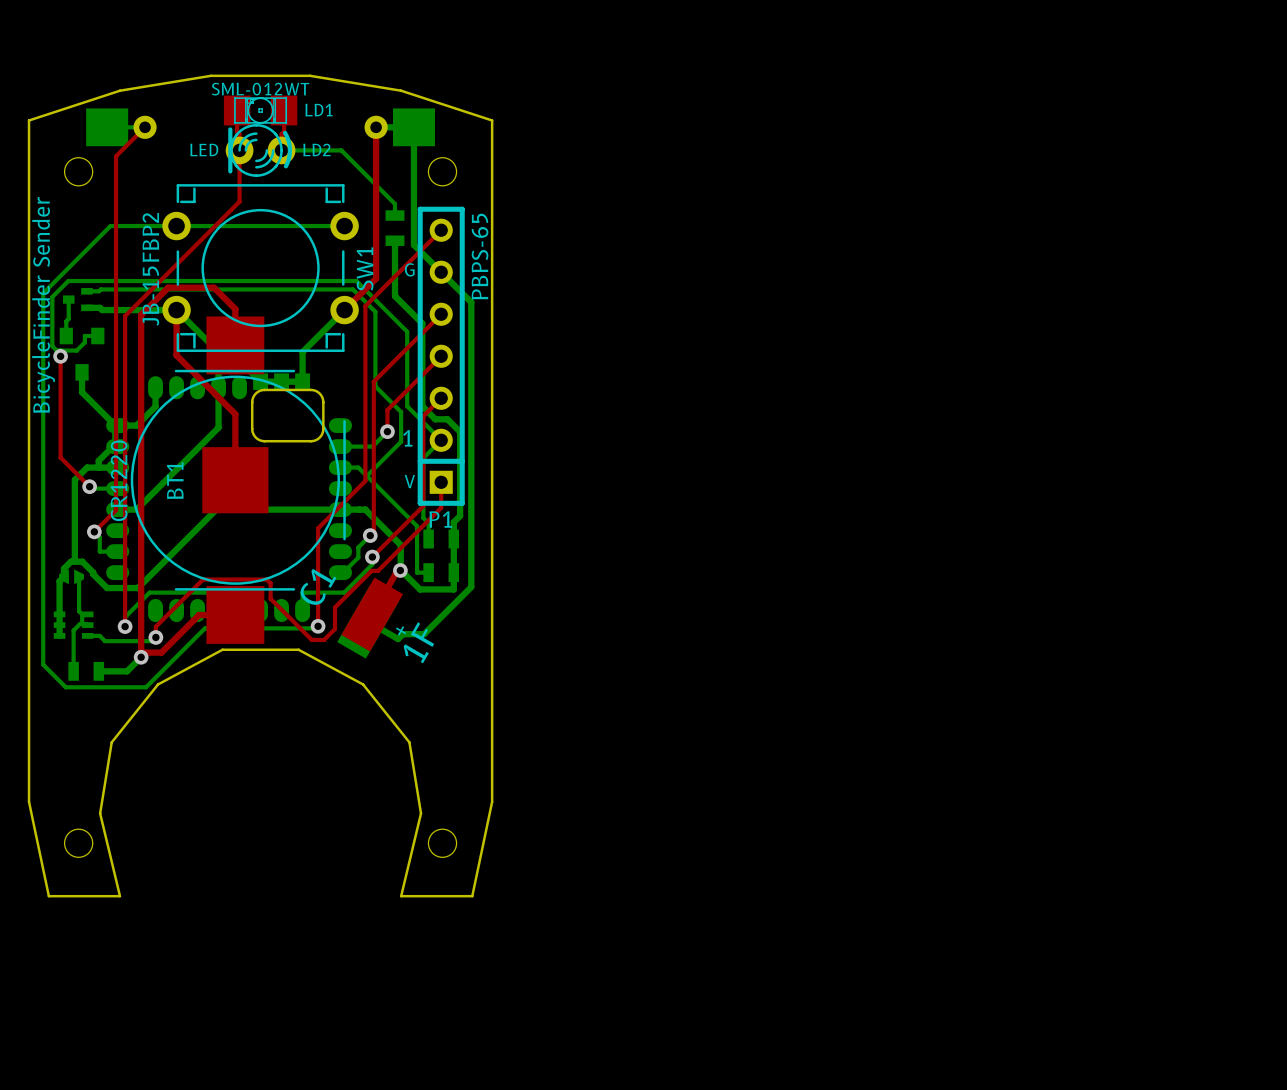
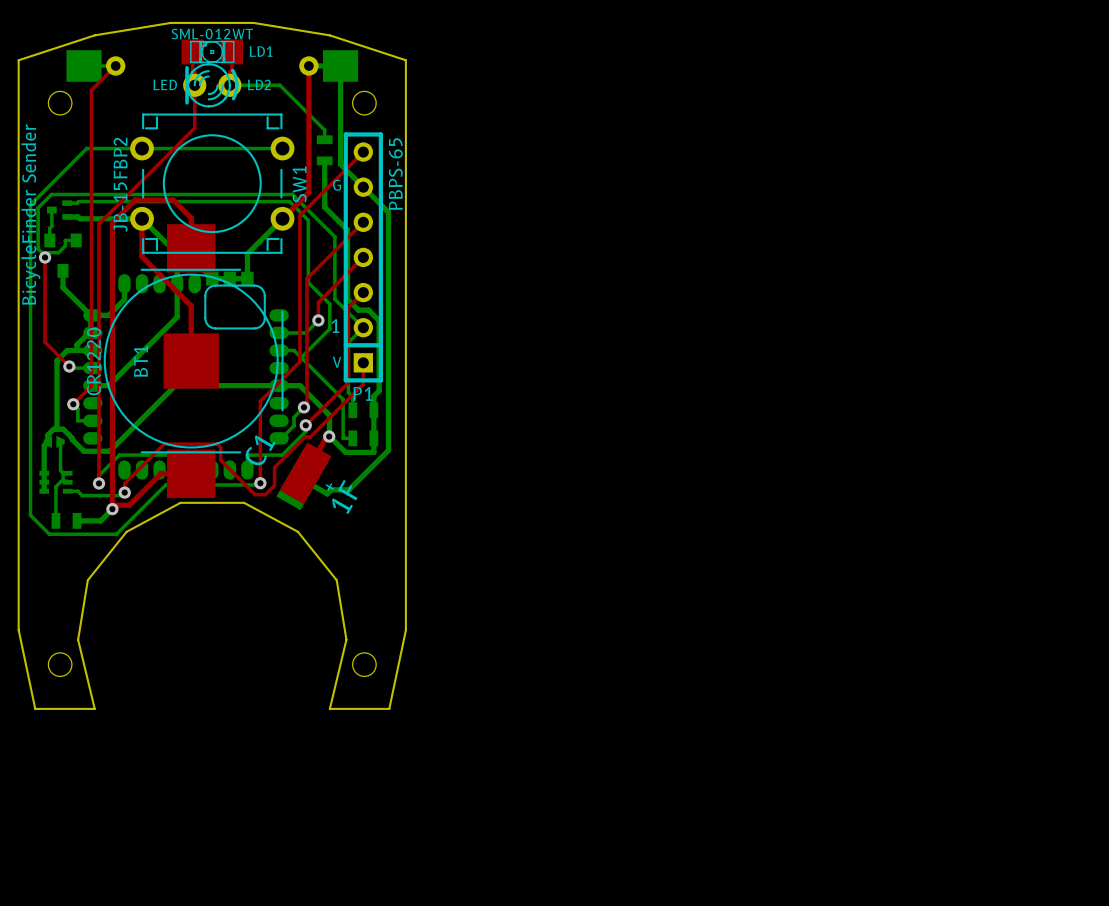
part footprint: [106, 373, 353, 623] -> [83, 271, 289, 480]

